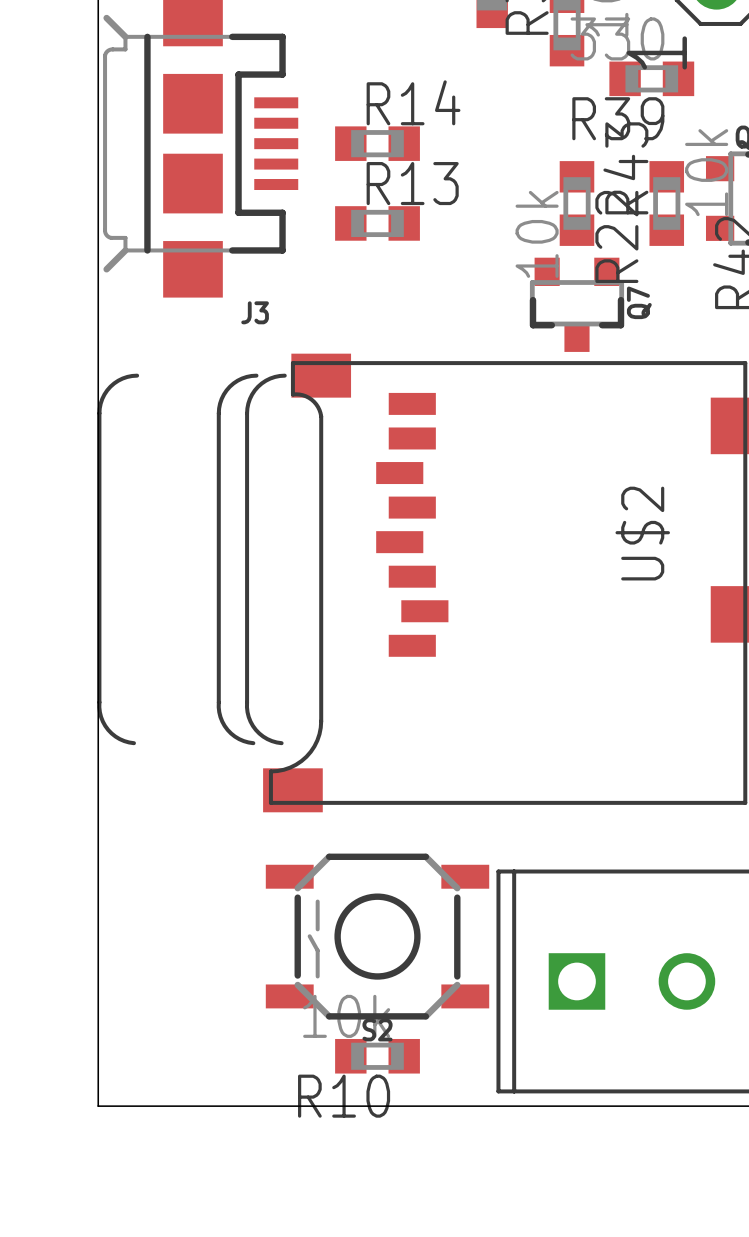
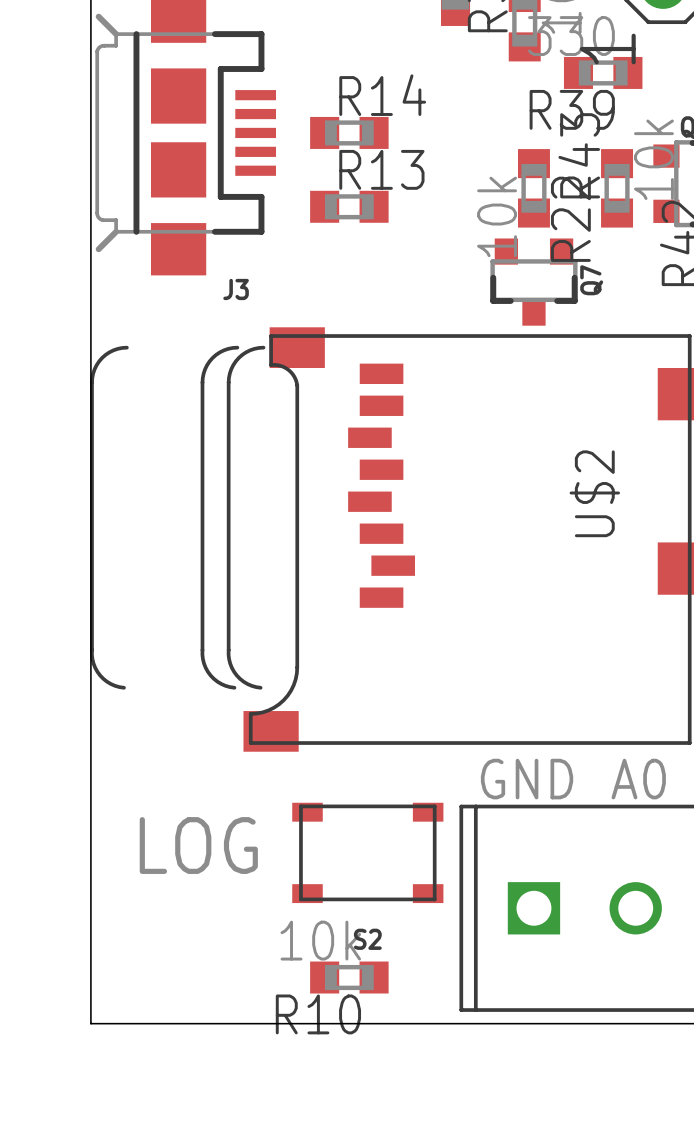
text: none -> GND (527, 779)
text: none -> A0 (638, 779)
S2 footprint: [265, 853, 490, 1020] -> [292, 802, 444, 904]
text: none -> LOG (198, 845)

